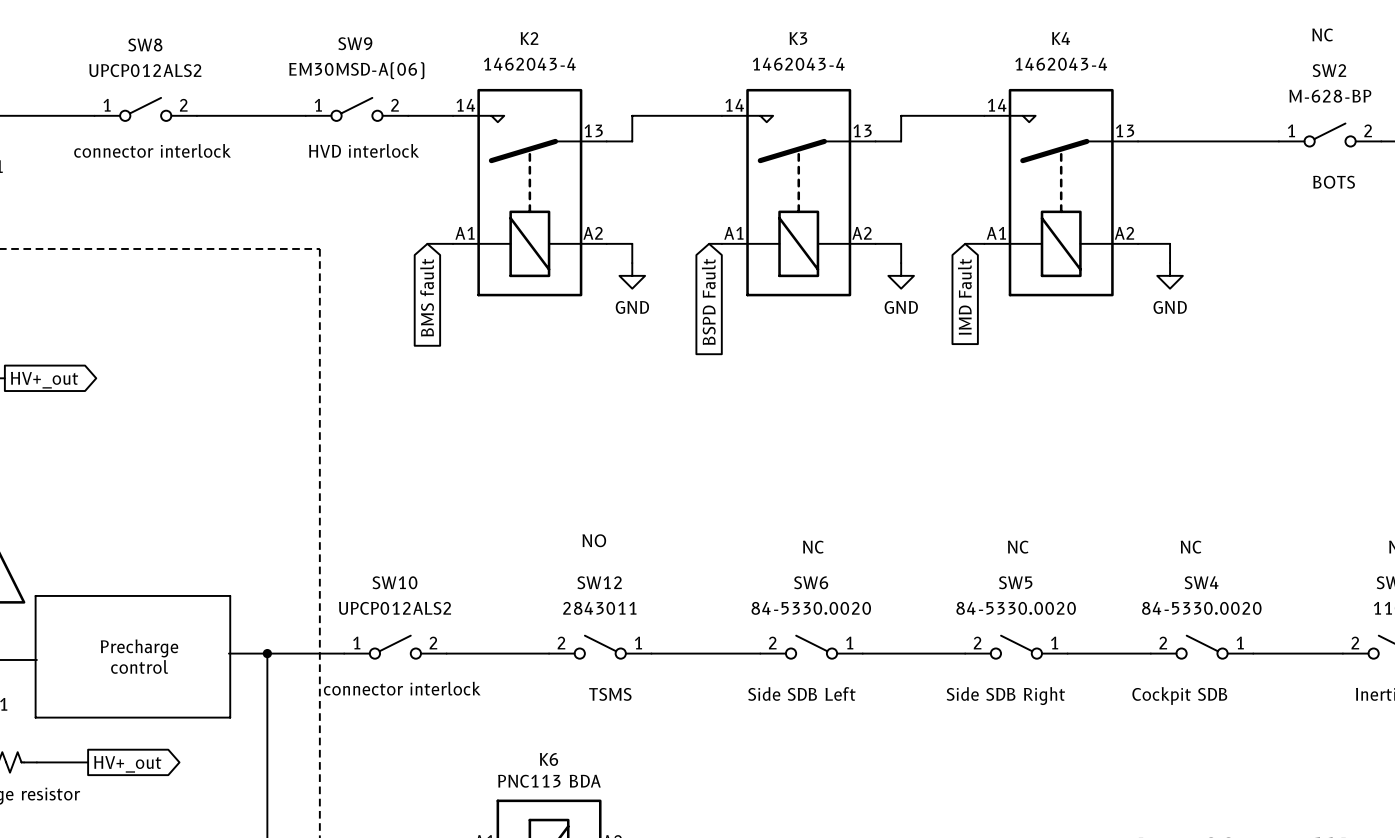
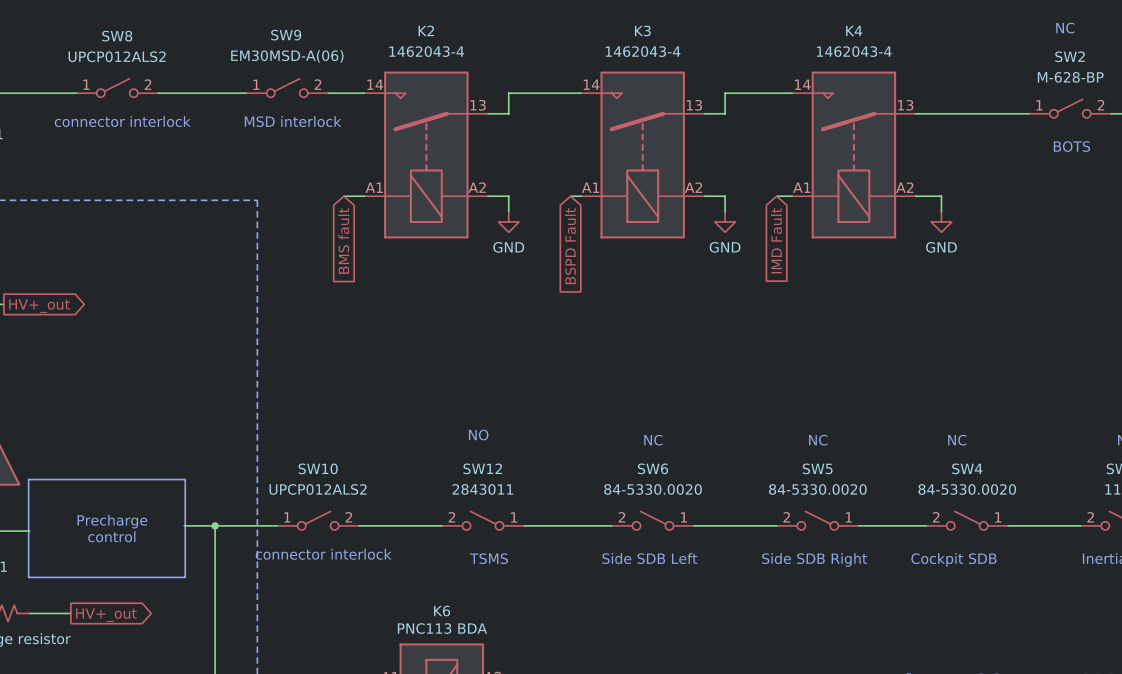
text: HVD interlock (364, 150) -> MSD interlock (293, 121)

